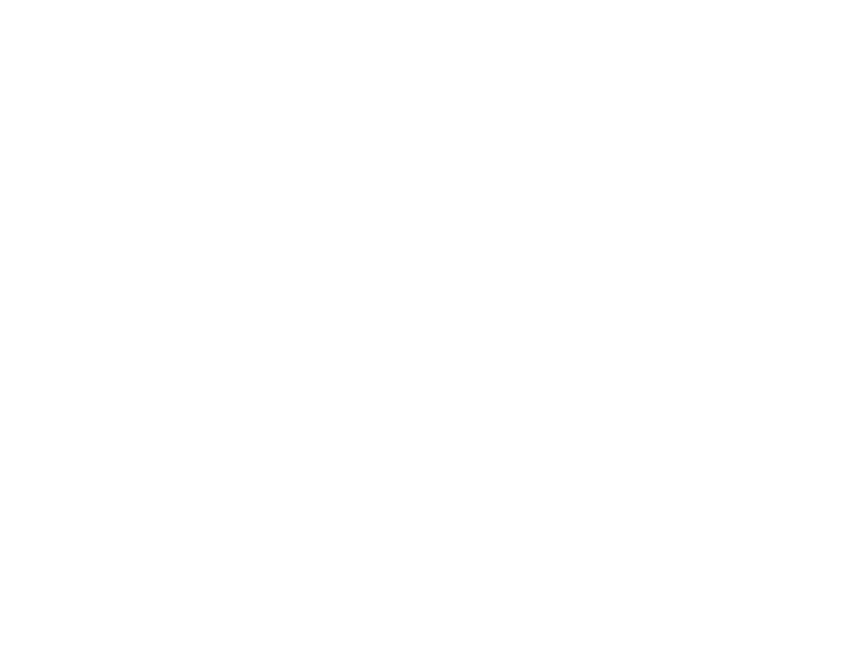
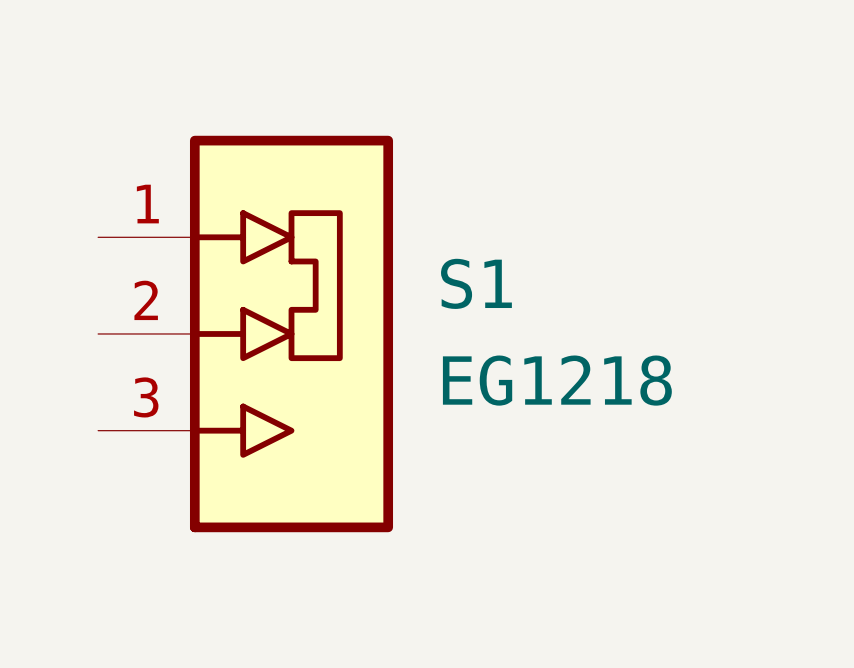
S1: none -> EG1218 (245, 333)

